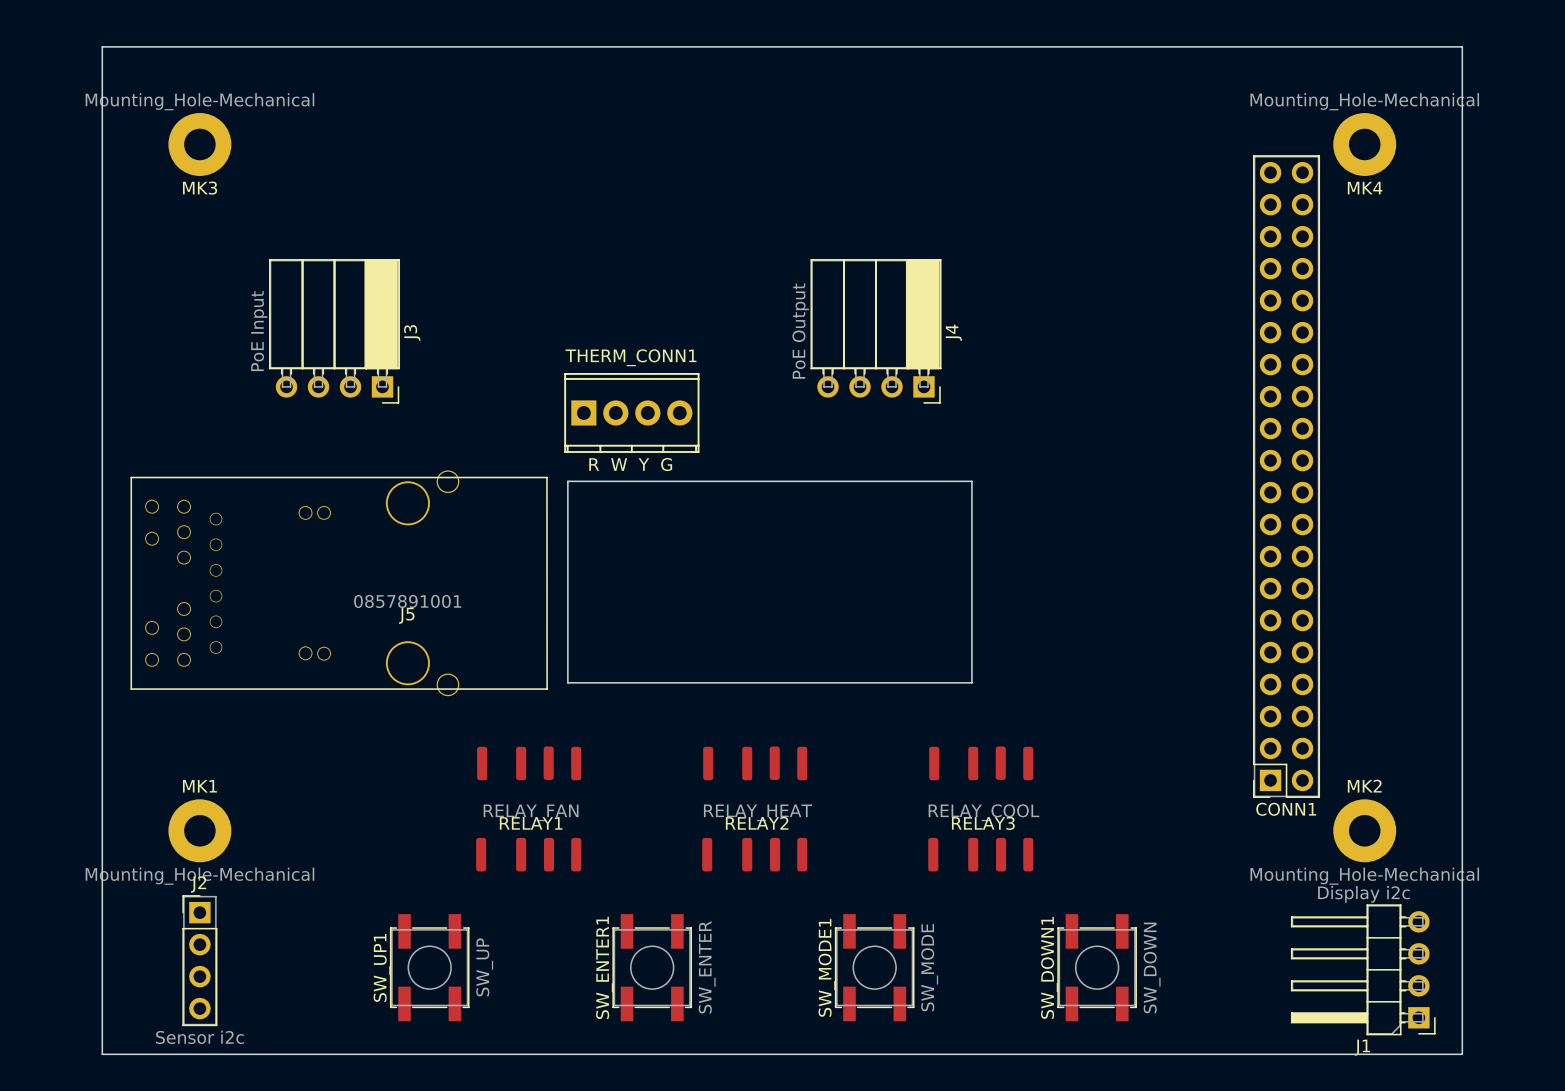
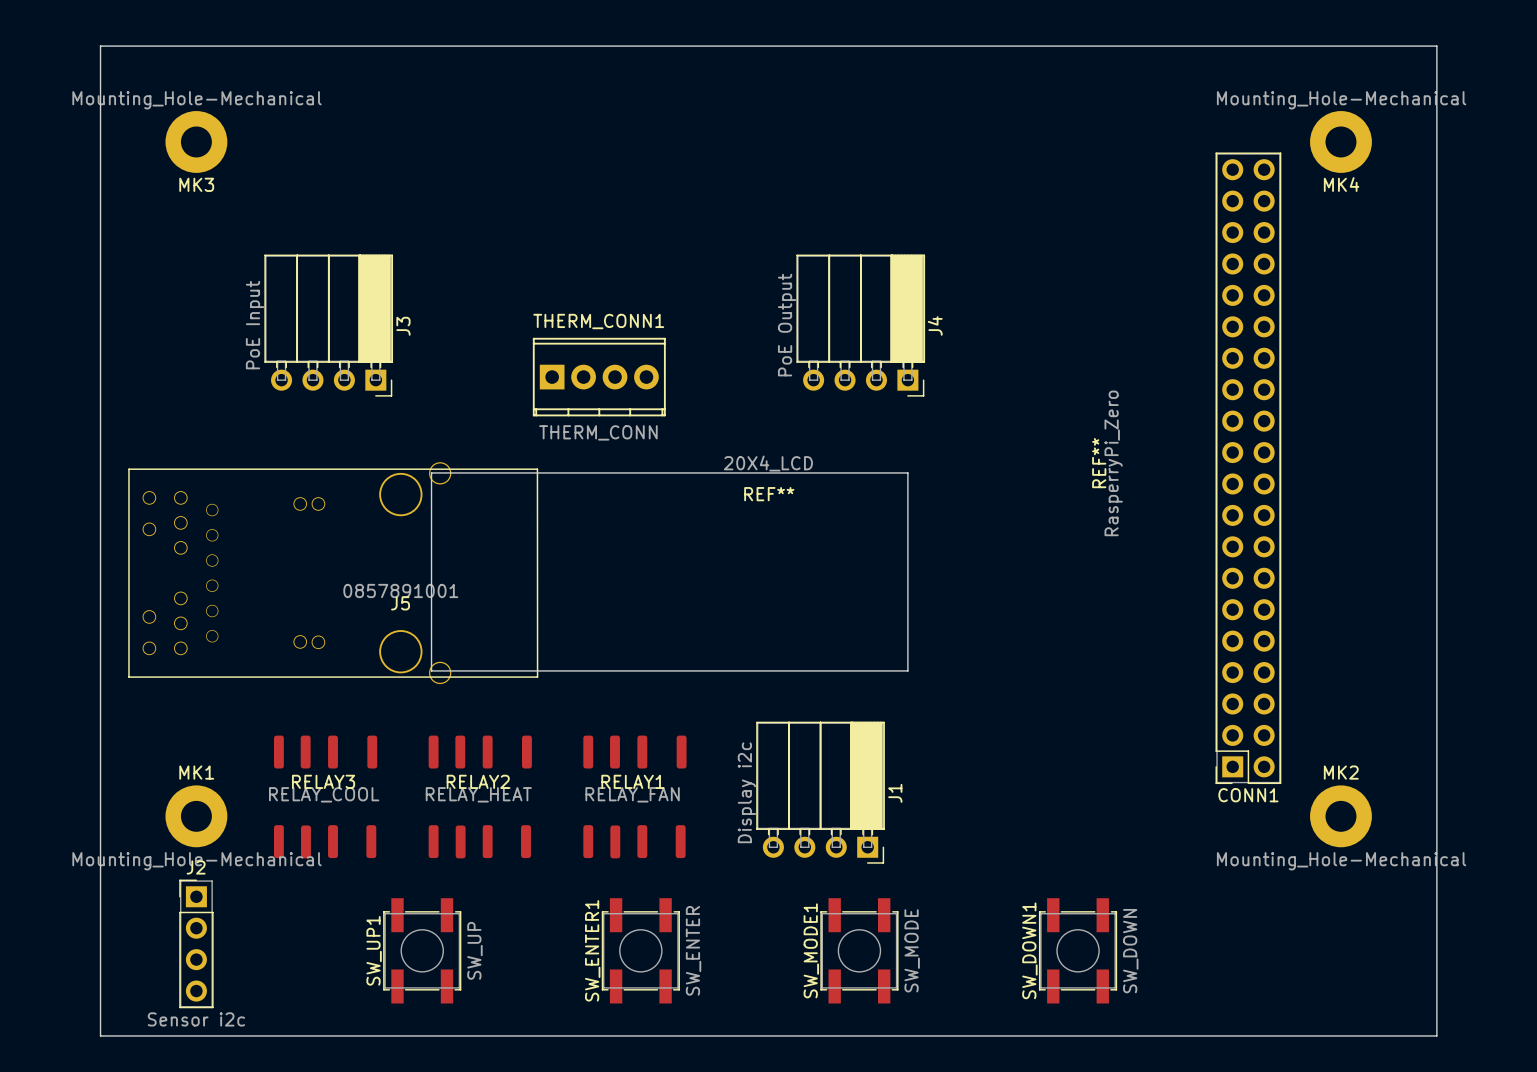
THERM_CONN1 position: (631, 412) -> (599, 377)
THERM_CONN1 value: none -> THERM_CONN (598, 432)
text: R W Y G (630, 464) -> none
REF**: none -> RasperryPi_Zero (1107, 463)
CONN1 position: (1286, 476) -> (1248, 468)
board edge: (567, 481) (567, 682) -> (557, 472) (431, 472) (431, 670) (557, 670)
board edge: (923, 481) (971, 481) (971, 682) (923, 682) -> (907, 472) (907, 670)
REF**: none -> 20X4_LCD (768, 478)
RELAY1 rotation: 0° (528, 808) -> 180° (634, 796)
RELAY1 position: (528, 808) -> (634, 796)
RELAY2 rotation: 0° (754, 808) -> 180° (480, 796)
RELAY2 position: (754, 808) -> (480, 796)
RELAY3 rotation: 0° (980, 808) -> 180° (325, 796)
RELAY3 position: (980, 808) -> (325, 796)
J1 value position: Display i2c (1363, 894) -> Display i2c (746, 792)
J1 footprint: [1290, 904, 1436, 1036] -> [756, 721, 885, 864]
J1 name position: J1 (1362, 1047) -> J1 (895, 793)

